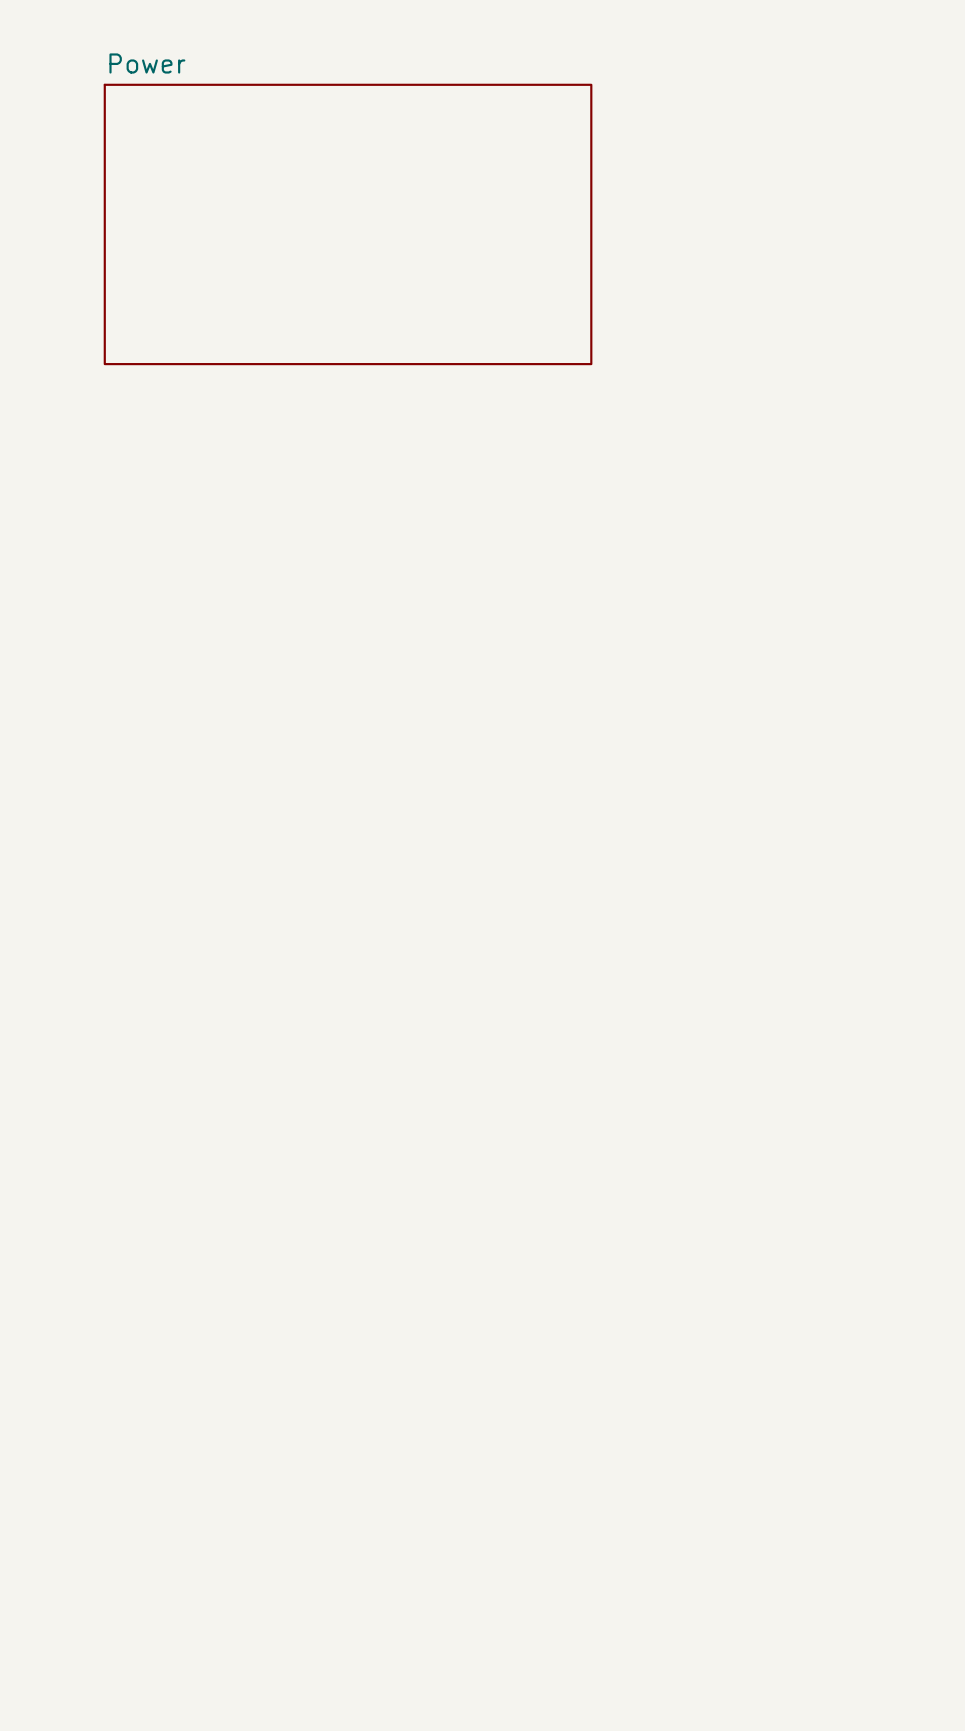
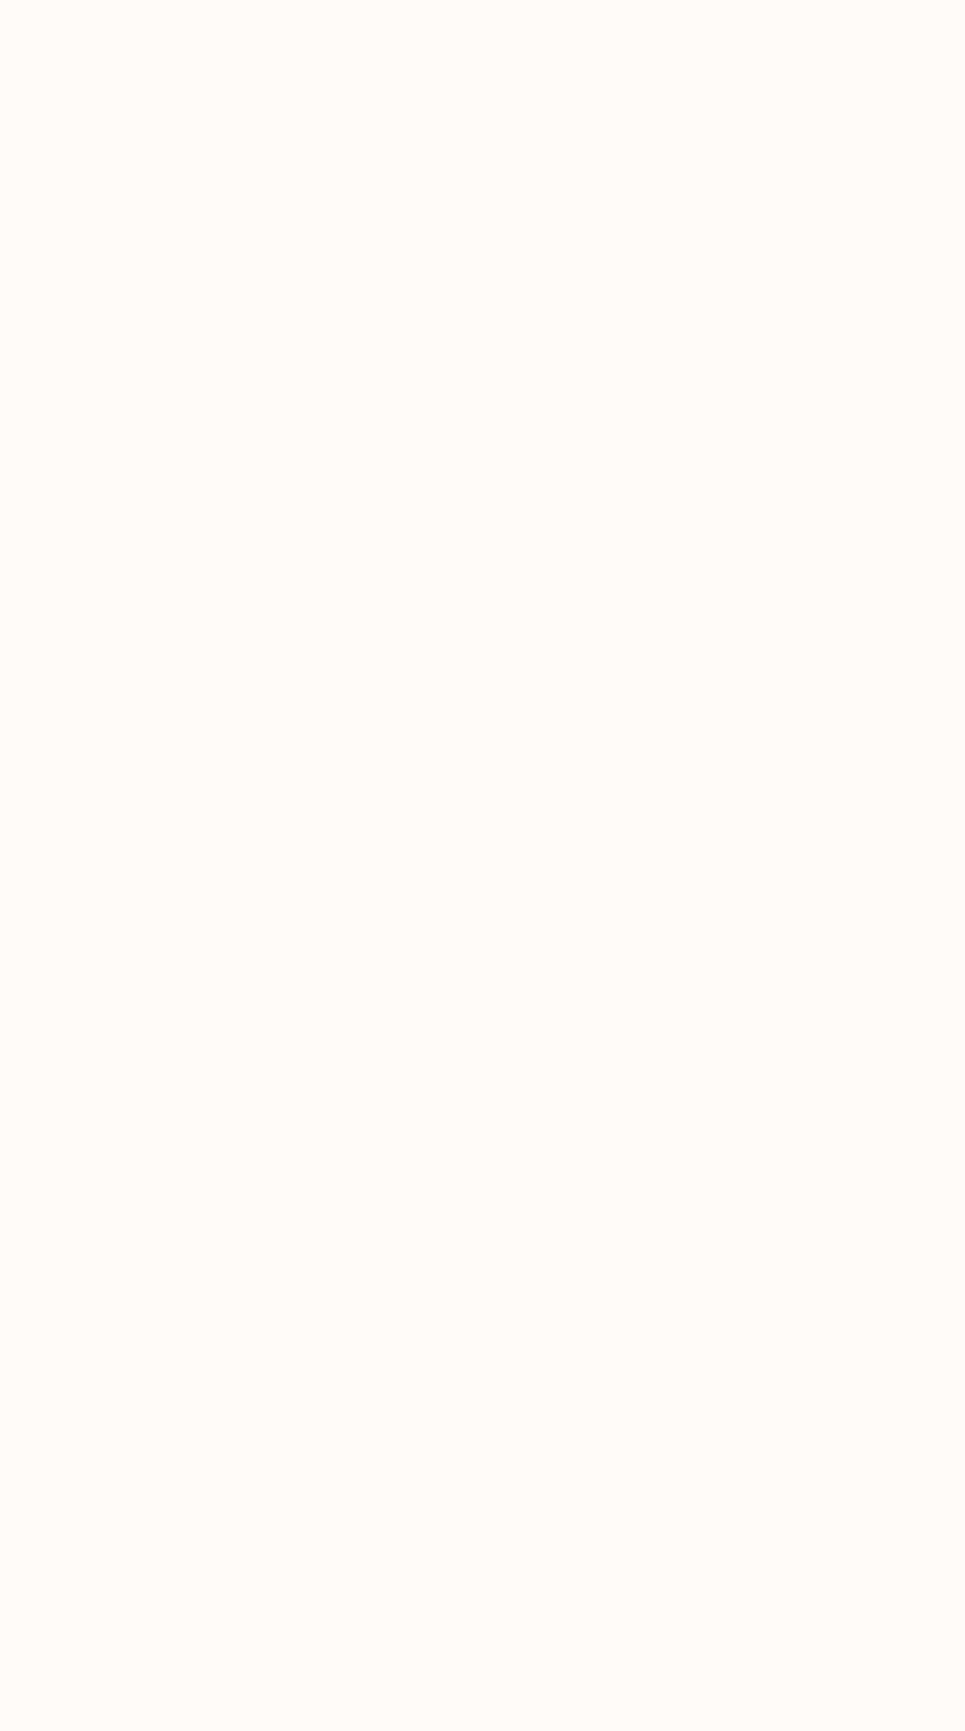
sheet Power: (348, 224) -> none

